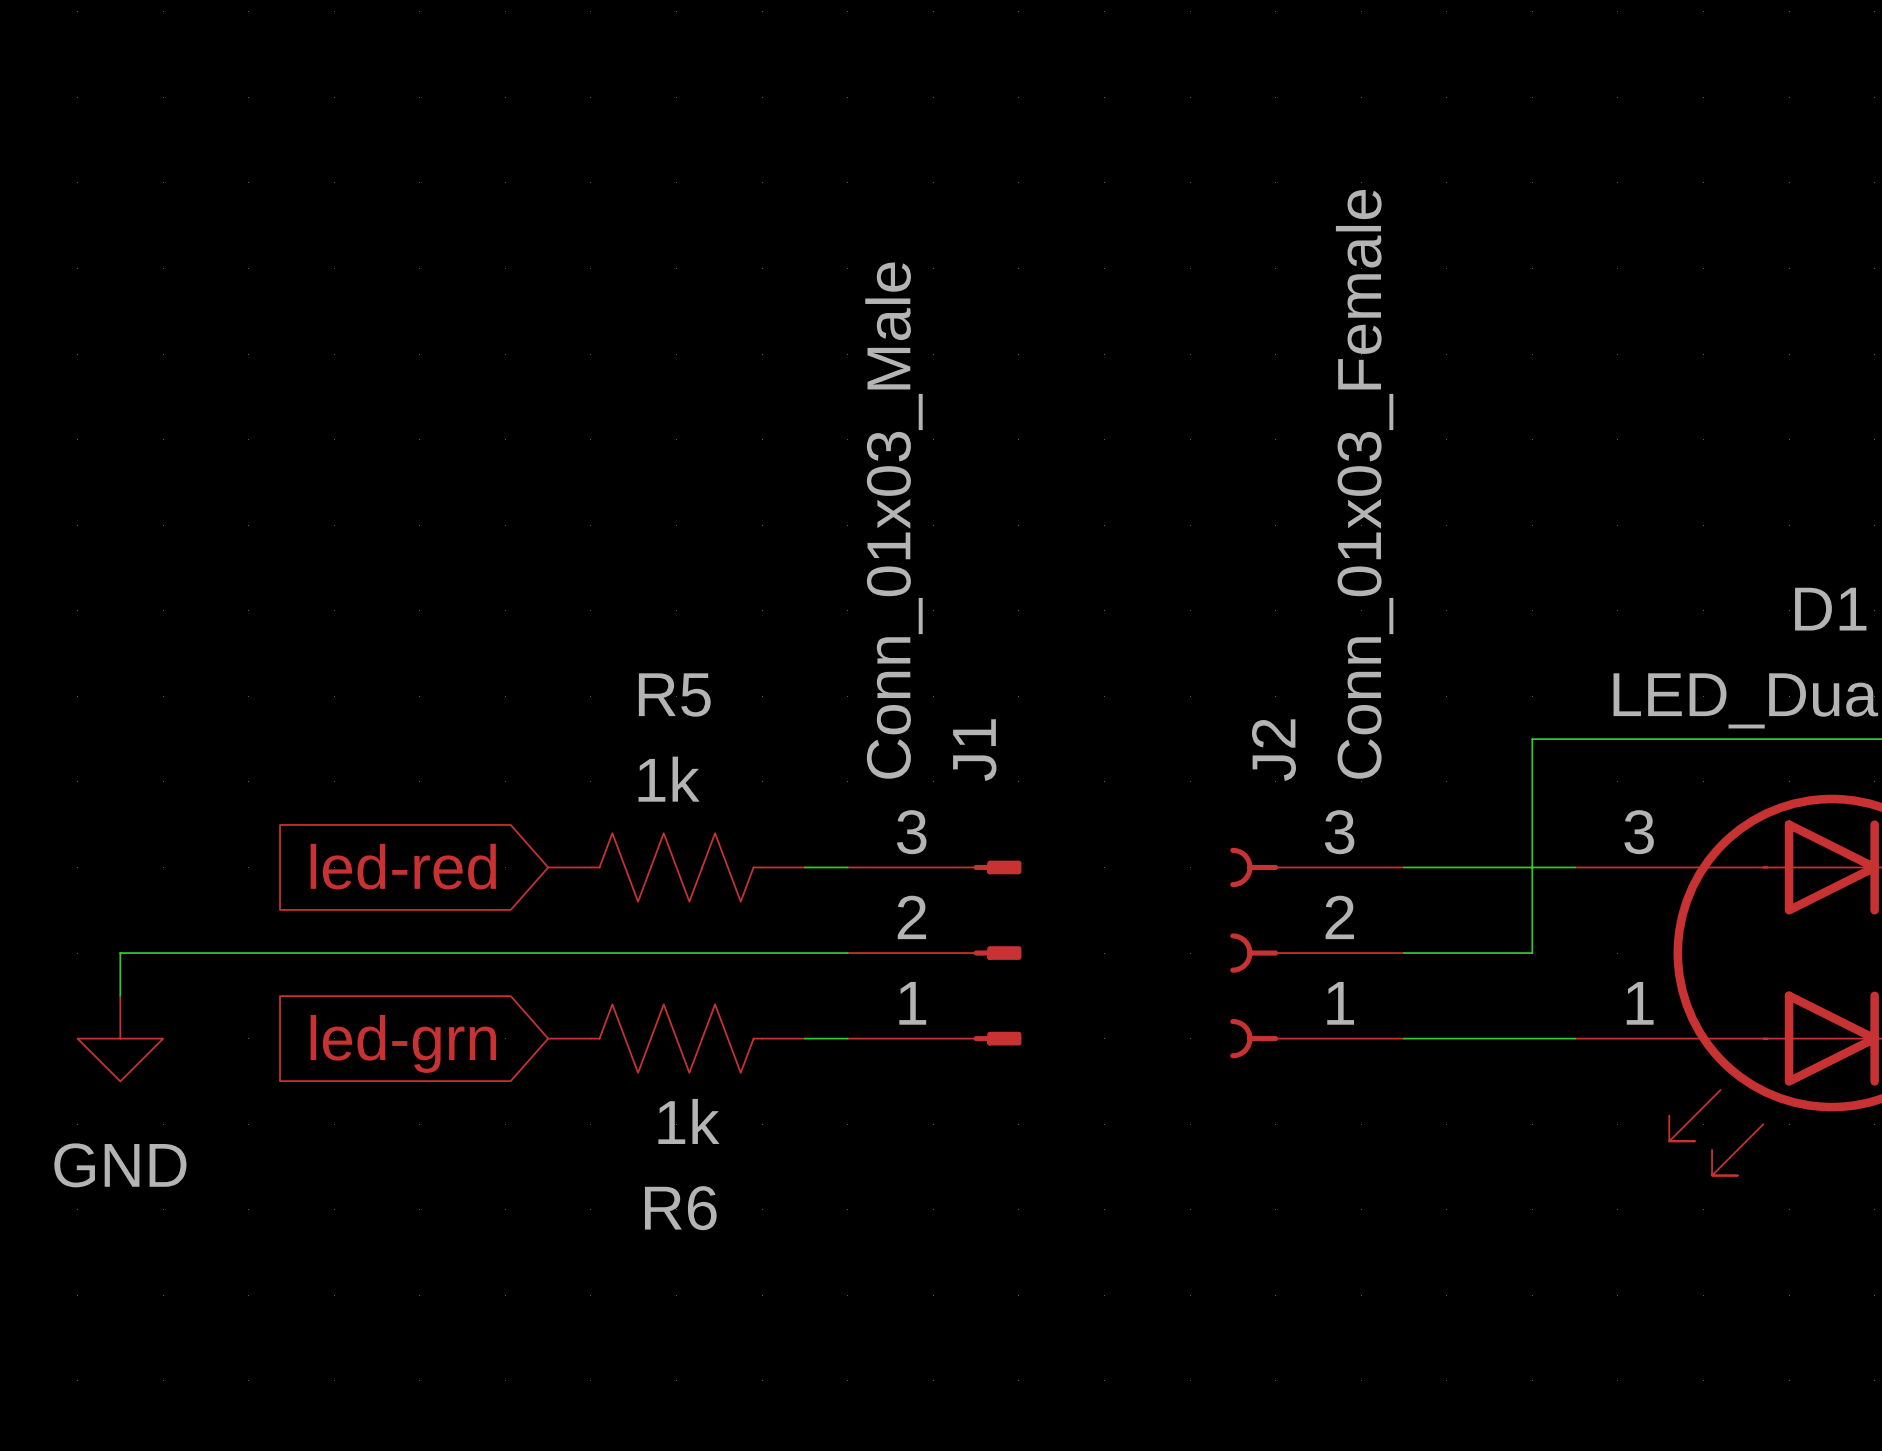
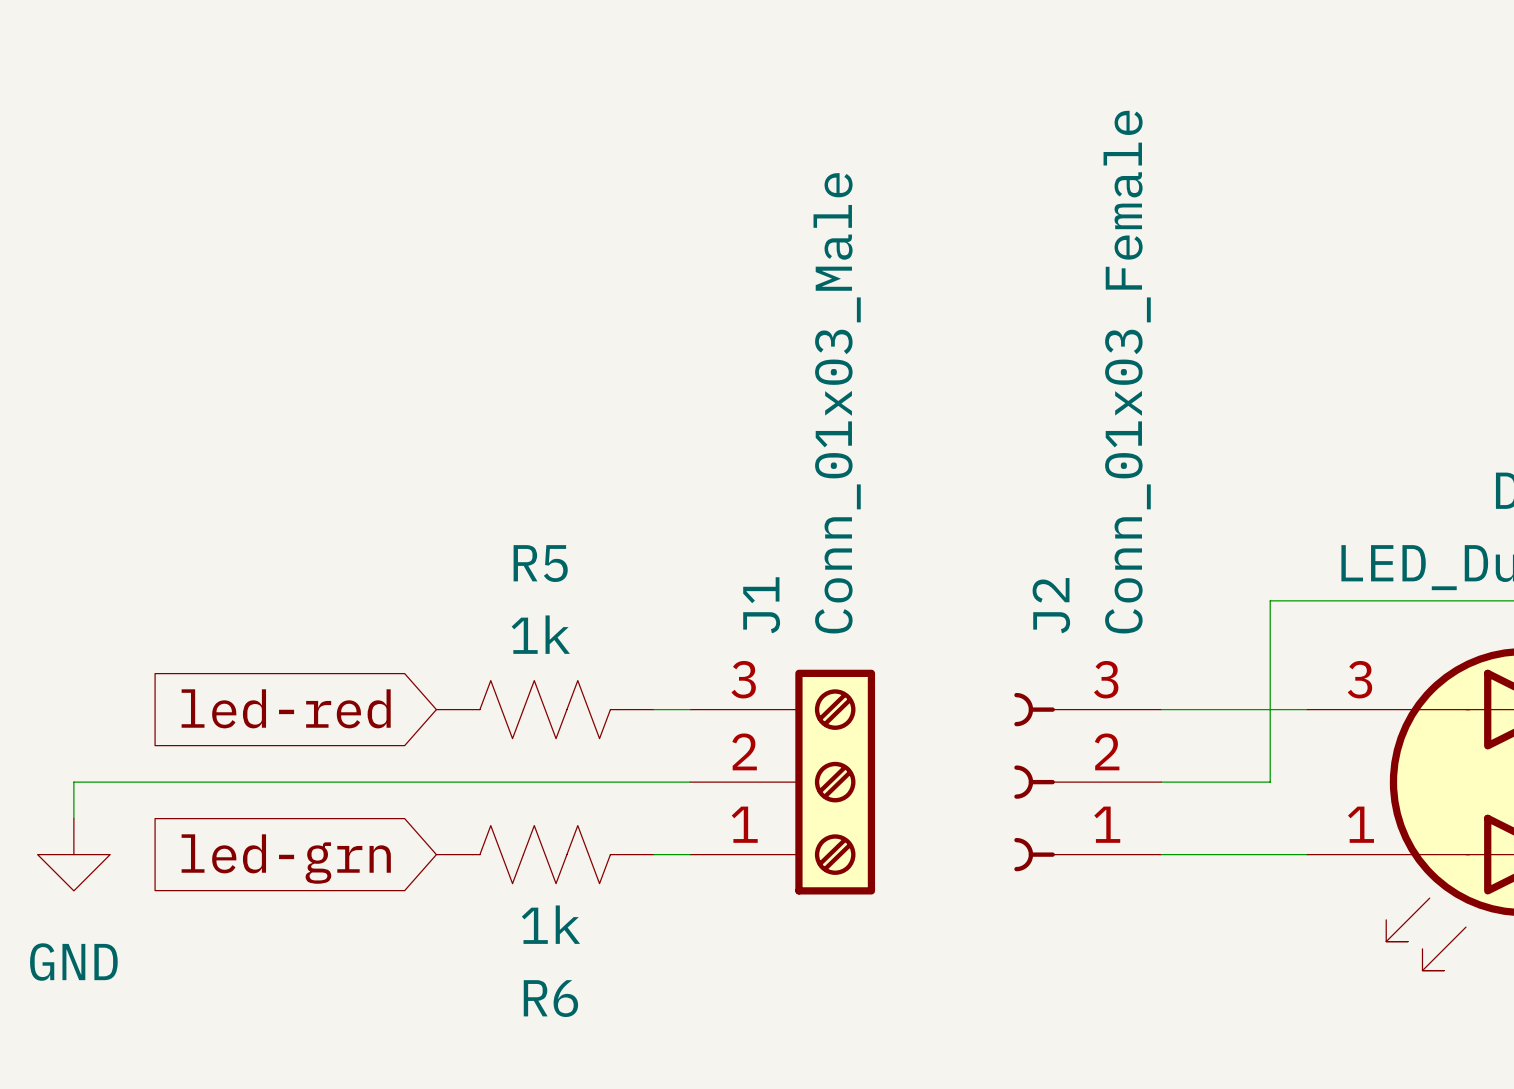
J1 value position: Conn_01x03_Male (893, 520) -> Conn_01x03_Male (837, 403)
J1 symbol: [847, 860, 1022, 1046] -> [690, 669, 876, 895]

